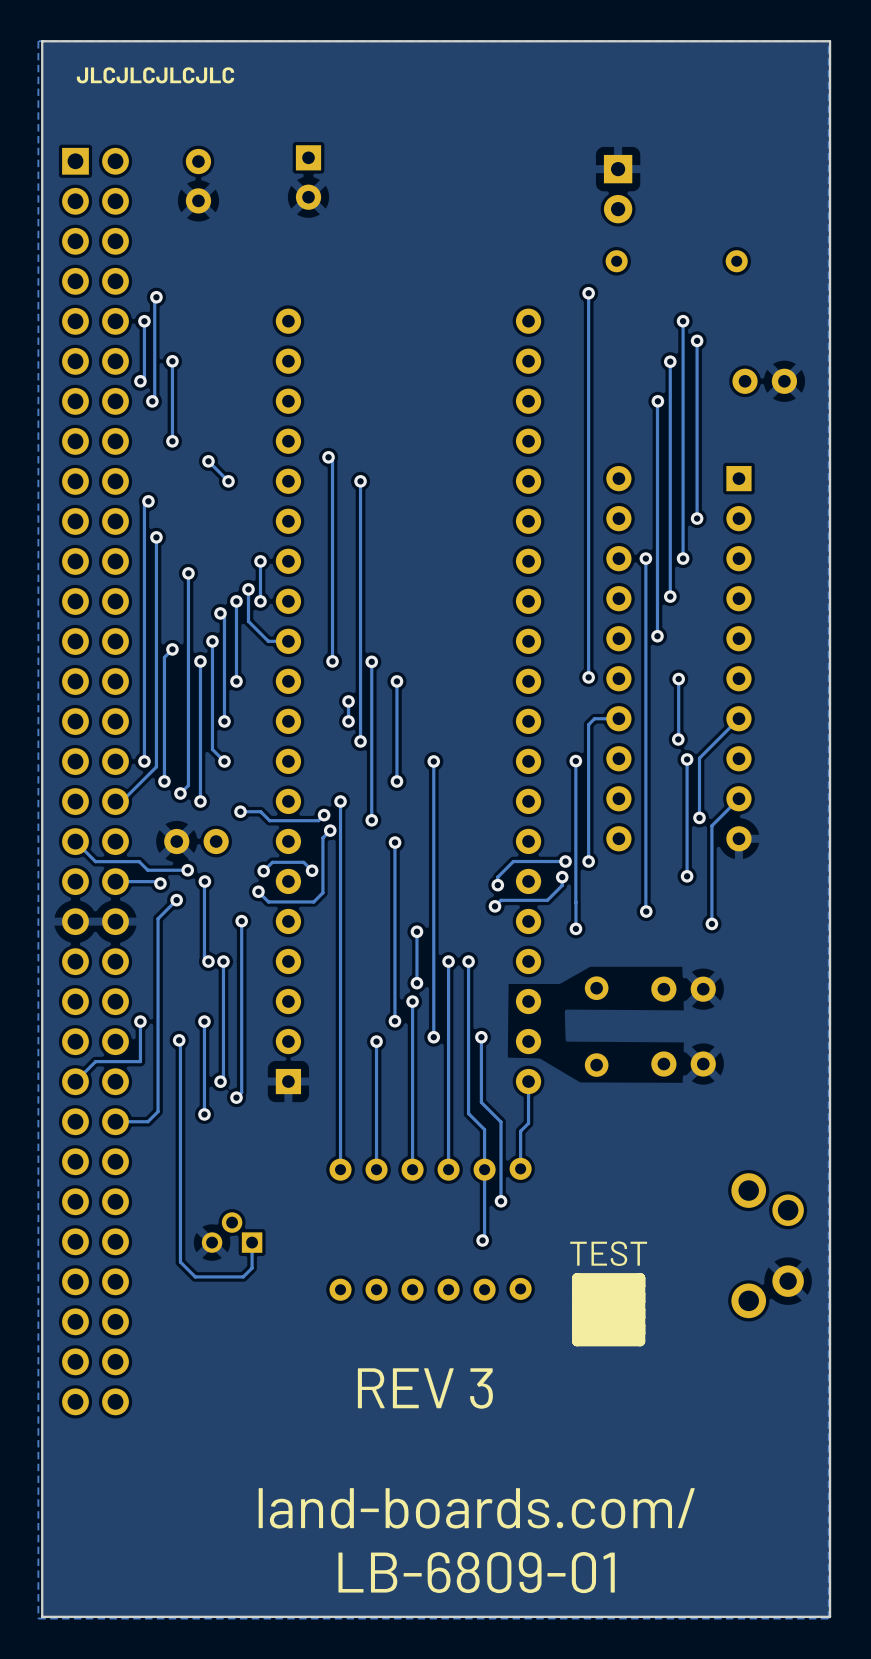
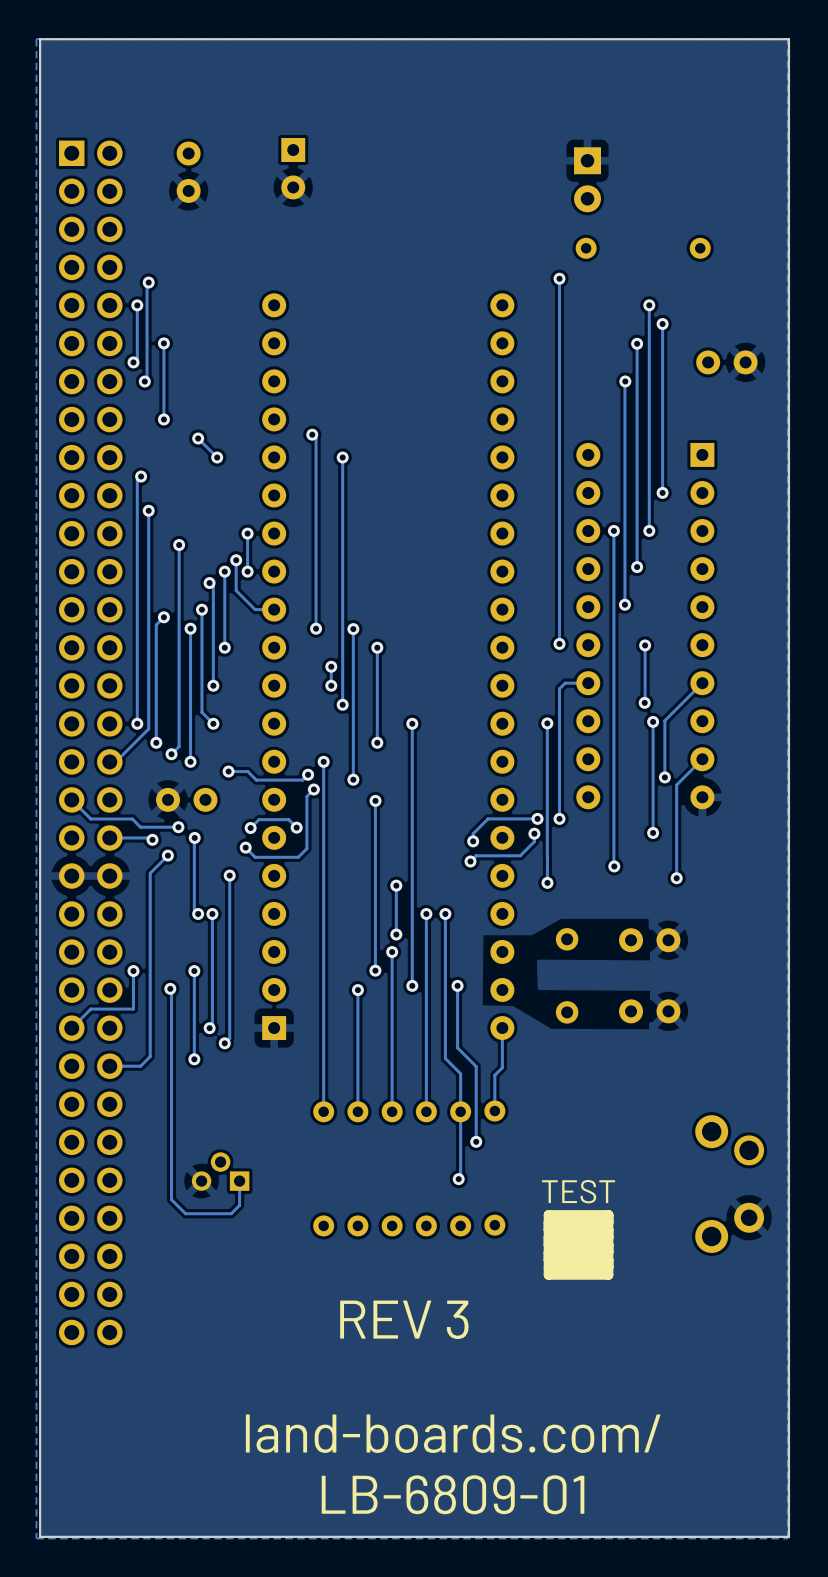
text: JLCJLCJLCJLC (155, 75) -> none

